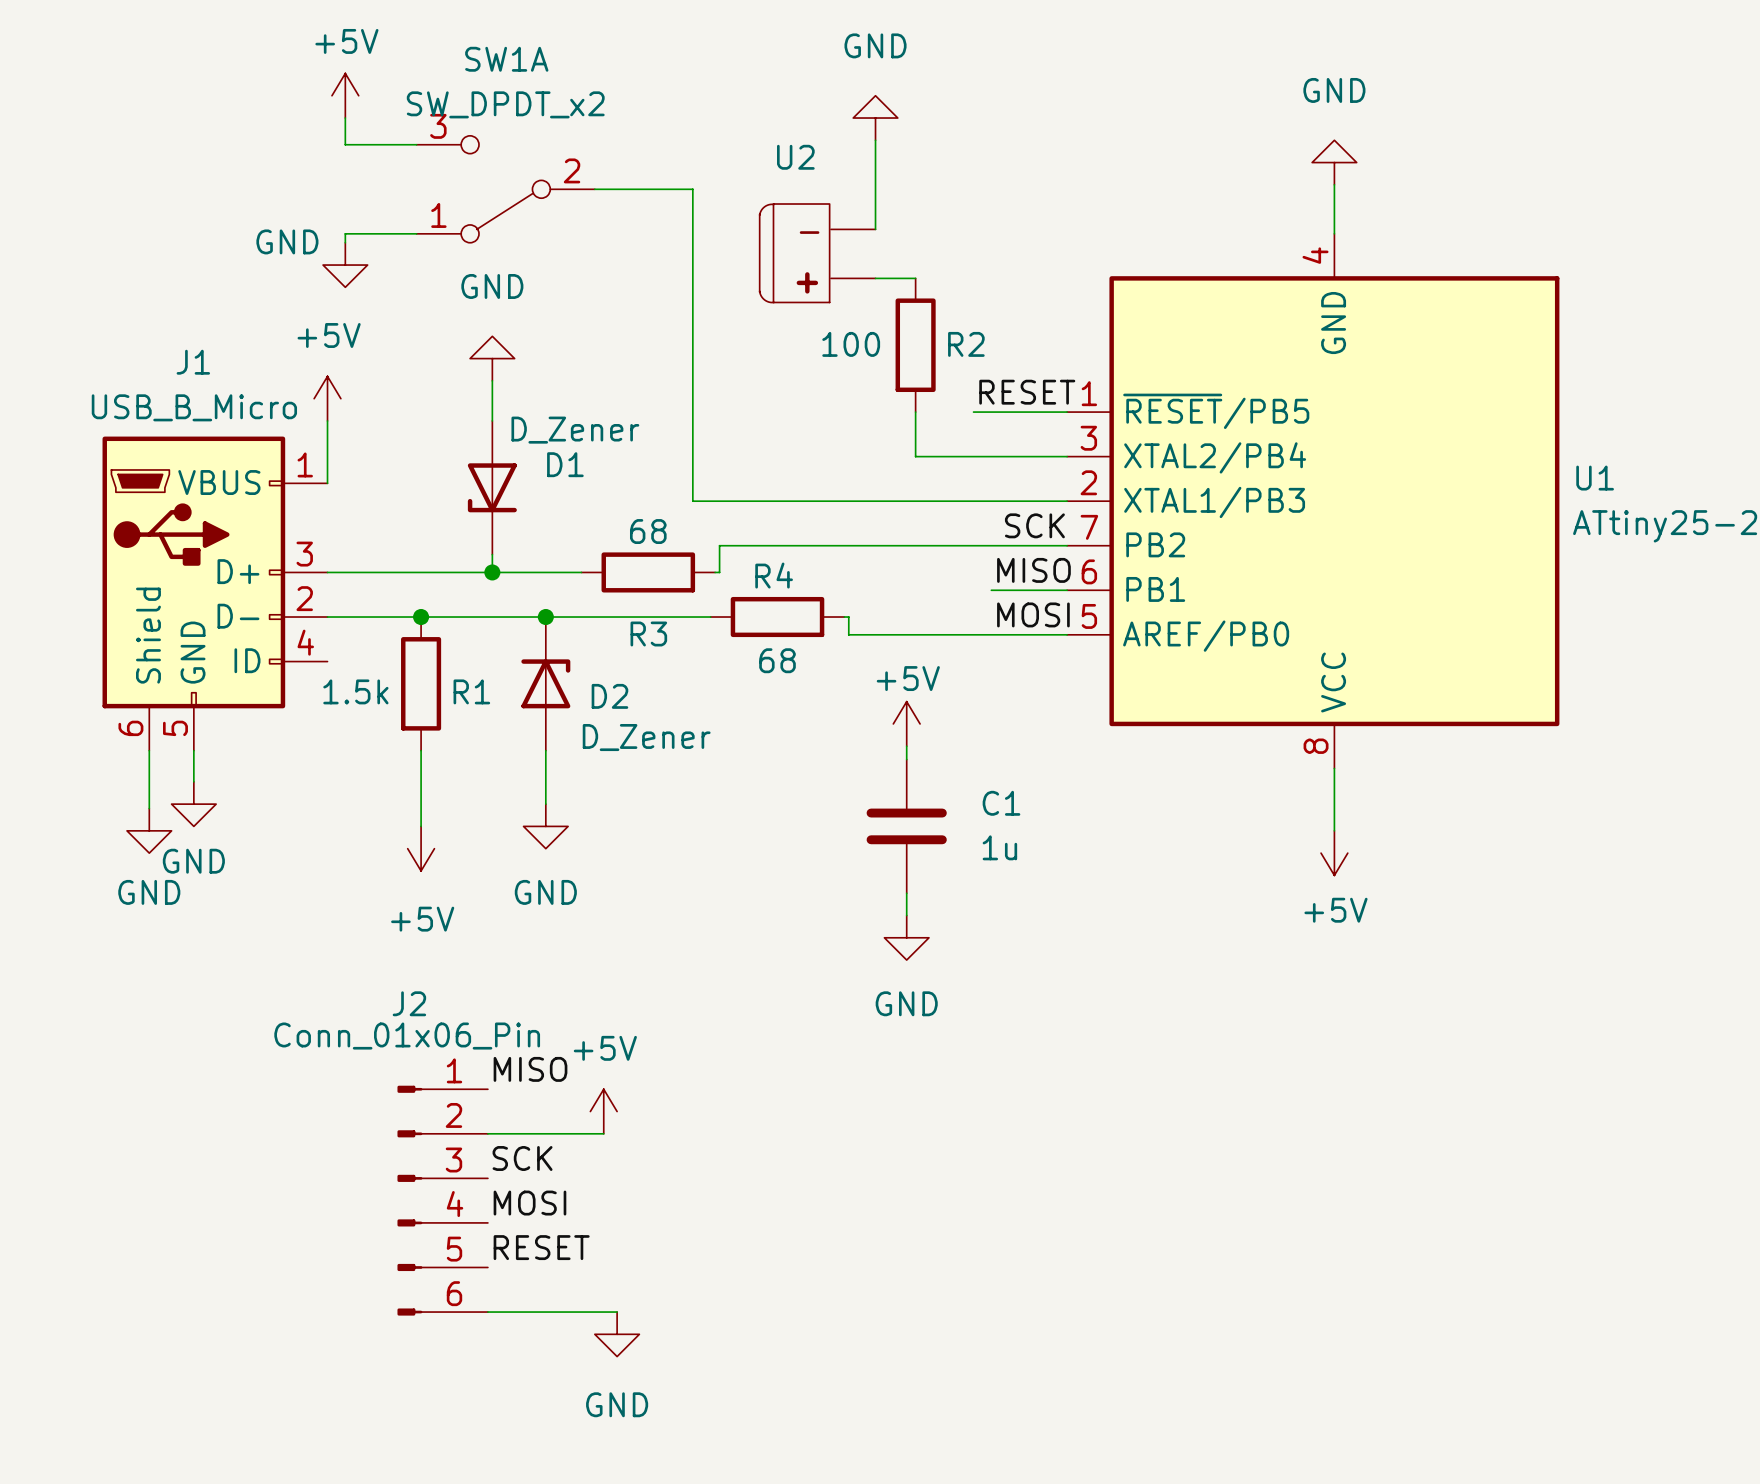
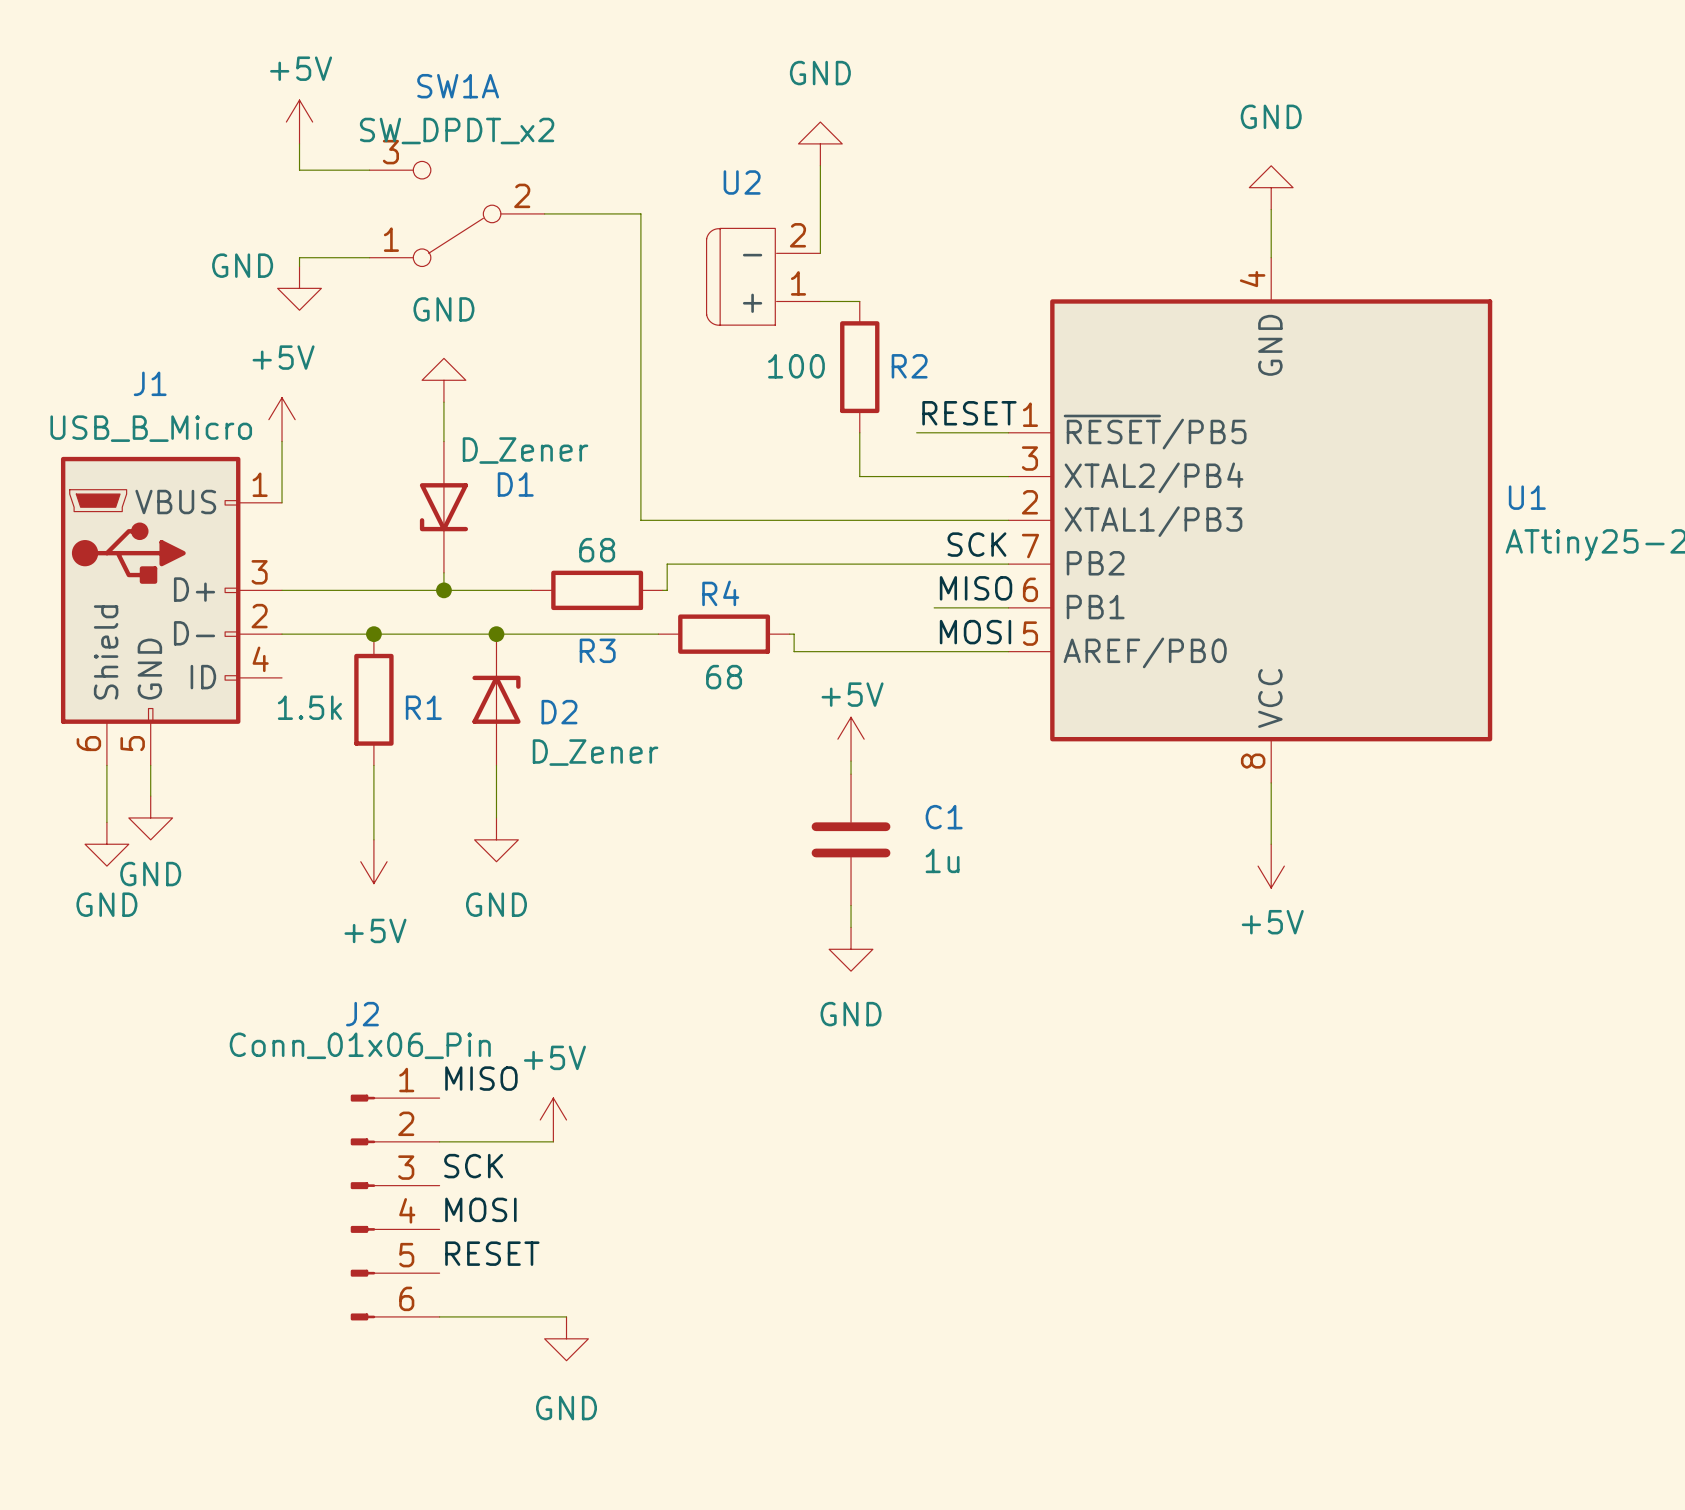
U2 pin number: none -> 2 (797, 235)
U2 pin name: none -> - (752, 255)
U2 text: - (809, 232) -> none
U2 pin number: none -> 1 (798, 283)
U2 pin name: none -> + (752, 303)
U2 text: + (807, 282) -> none

